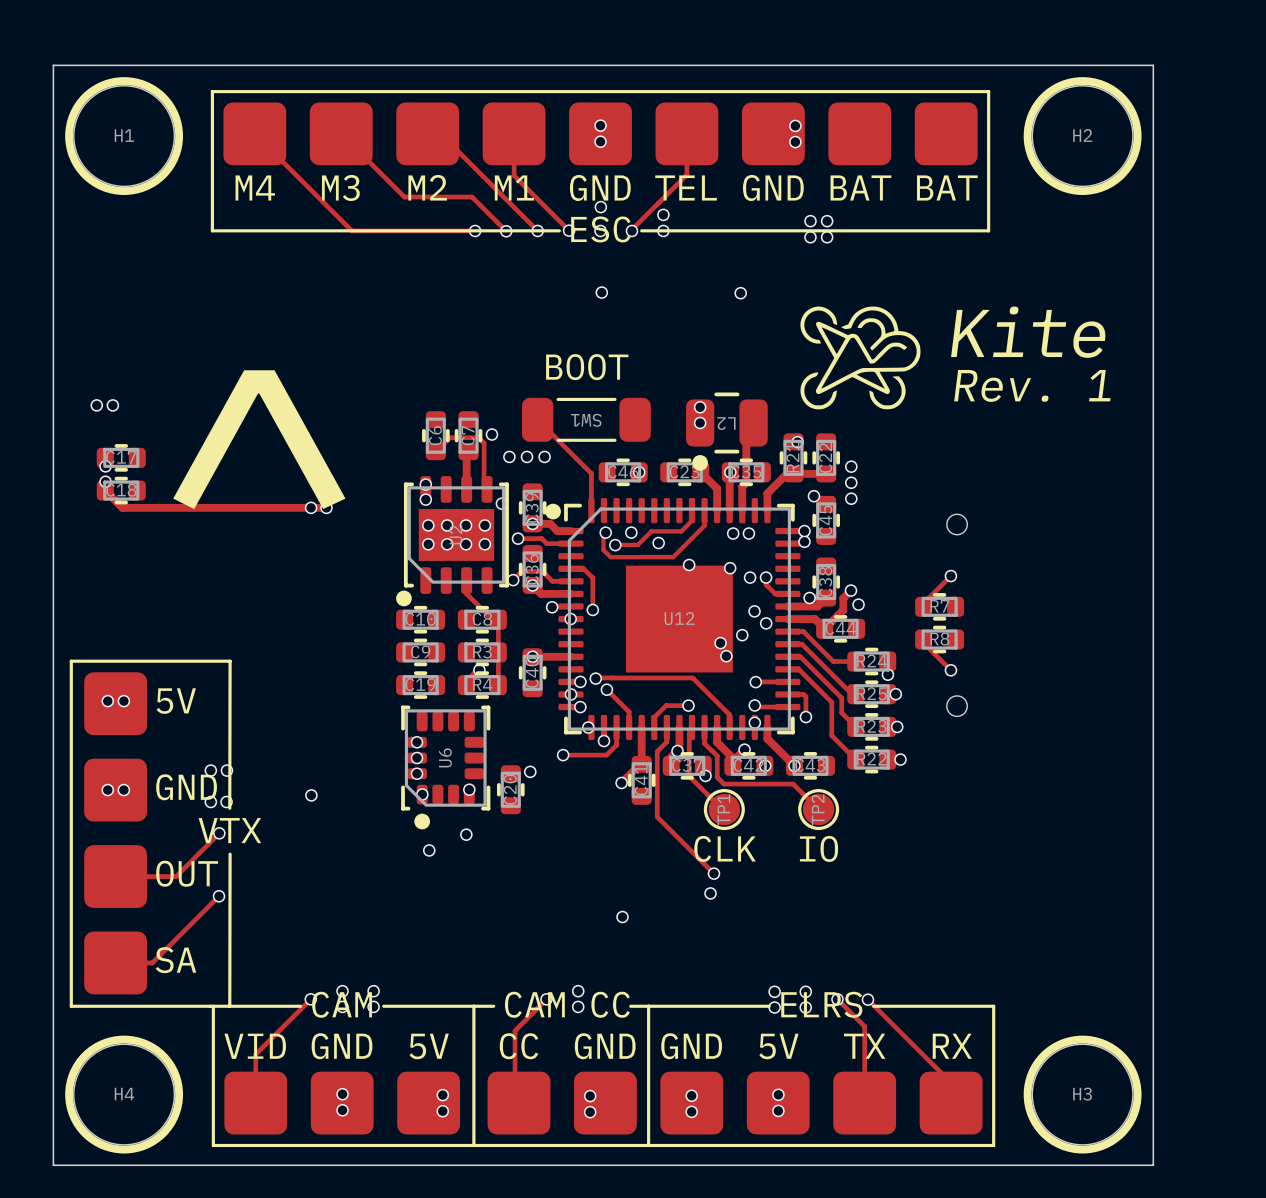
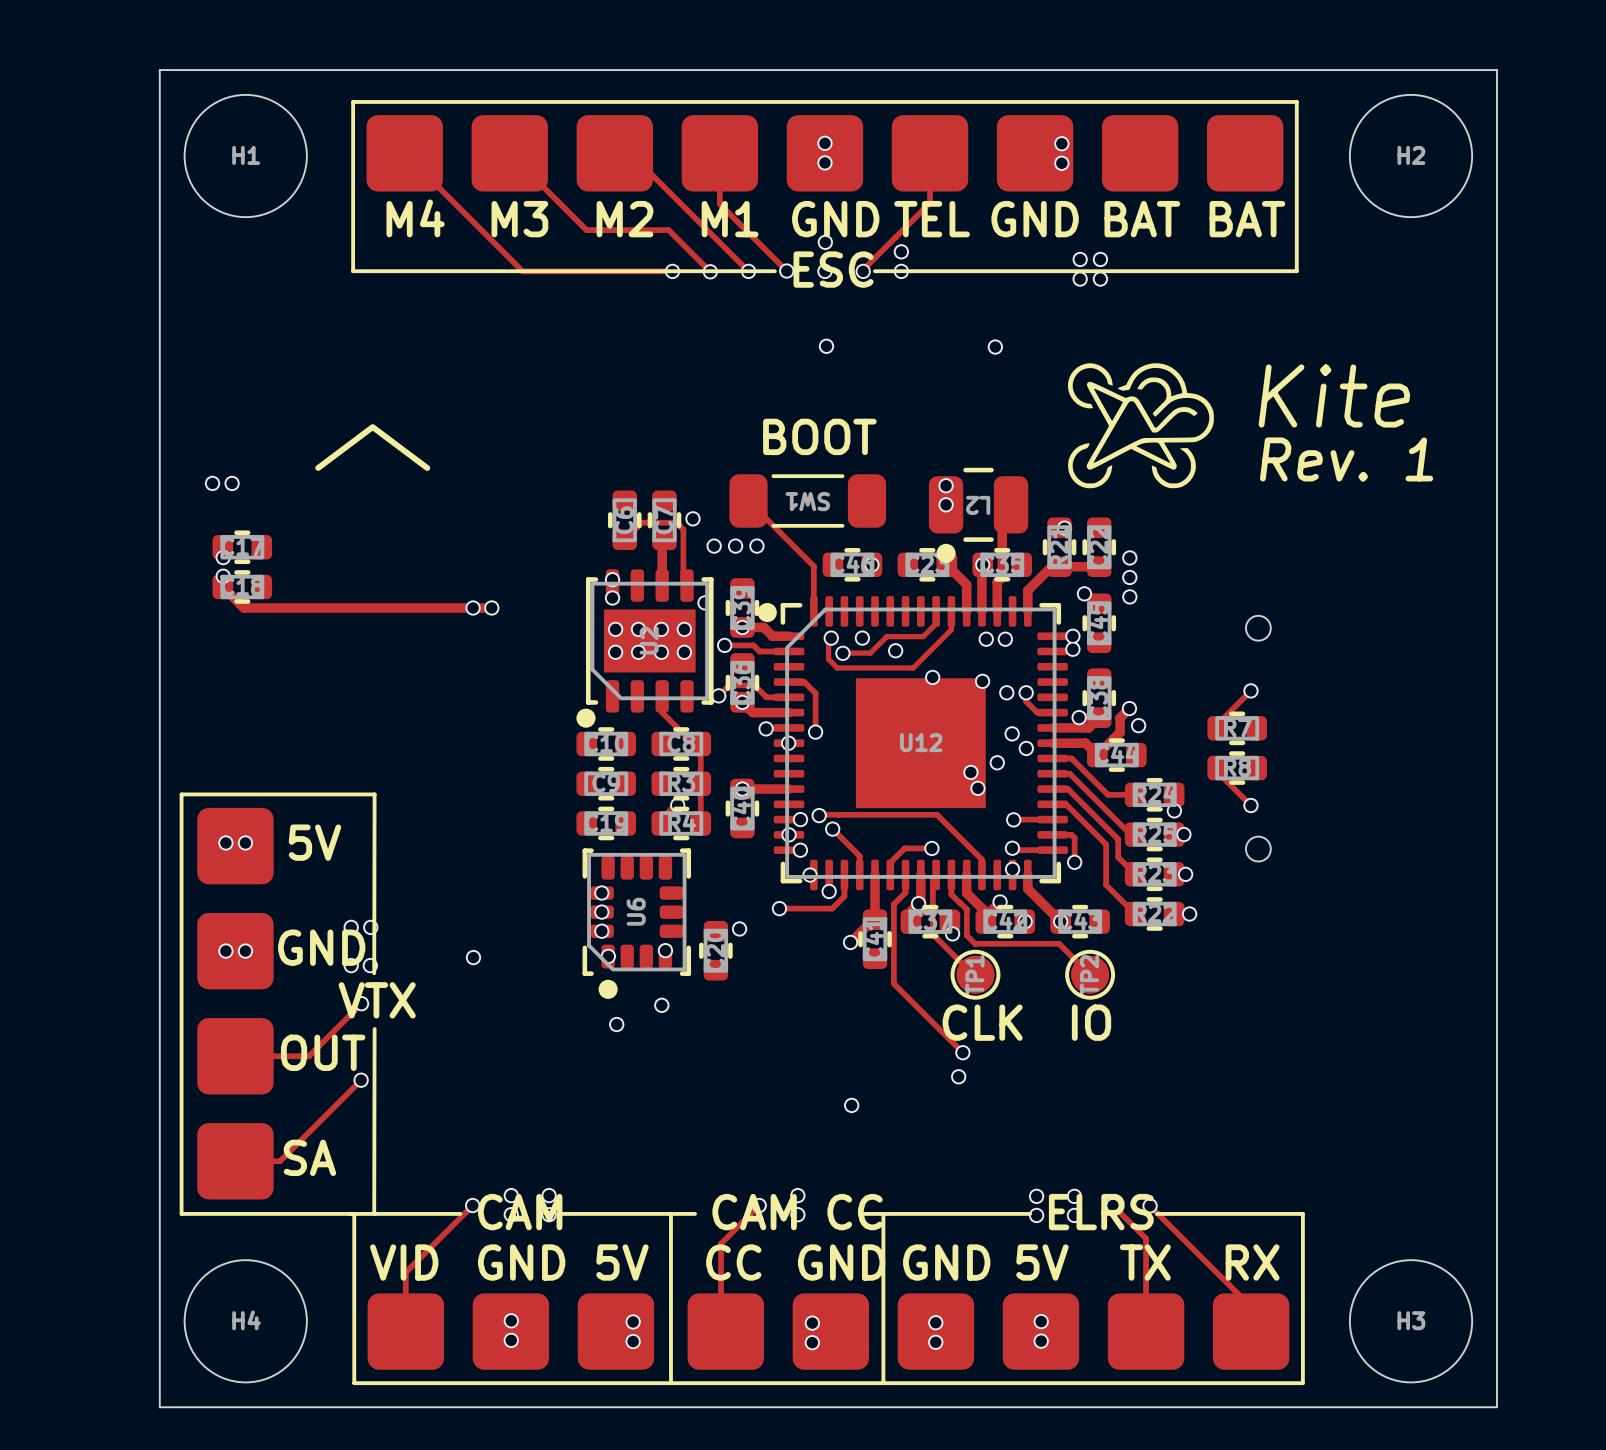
drawing: [65, 77, 184, 195] -> none
drawing: [1023, 77, 1142, 195] -> none
drawing: [65, 1035, 184, 1154] -> none
drawing: [1023, 1035, 1142, 1154] -> none

